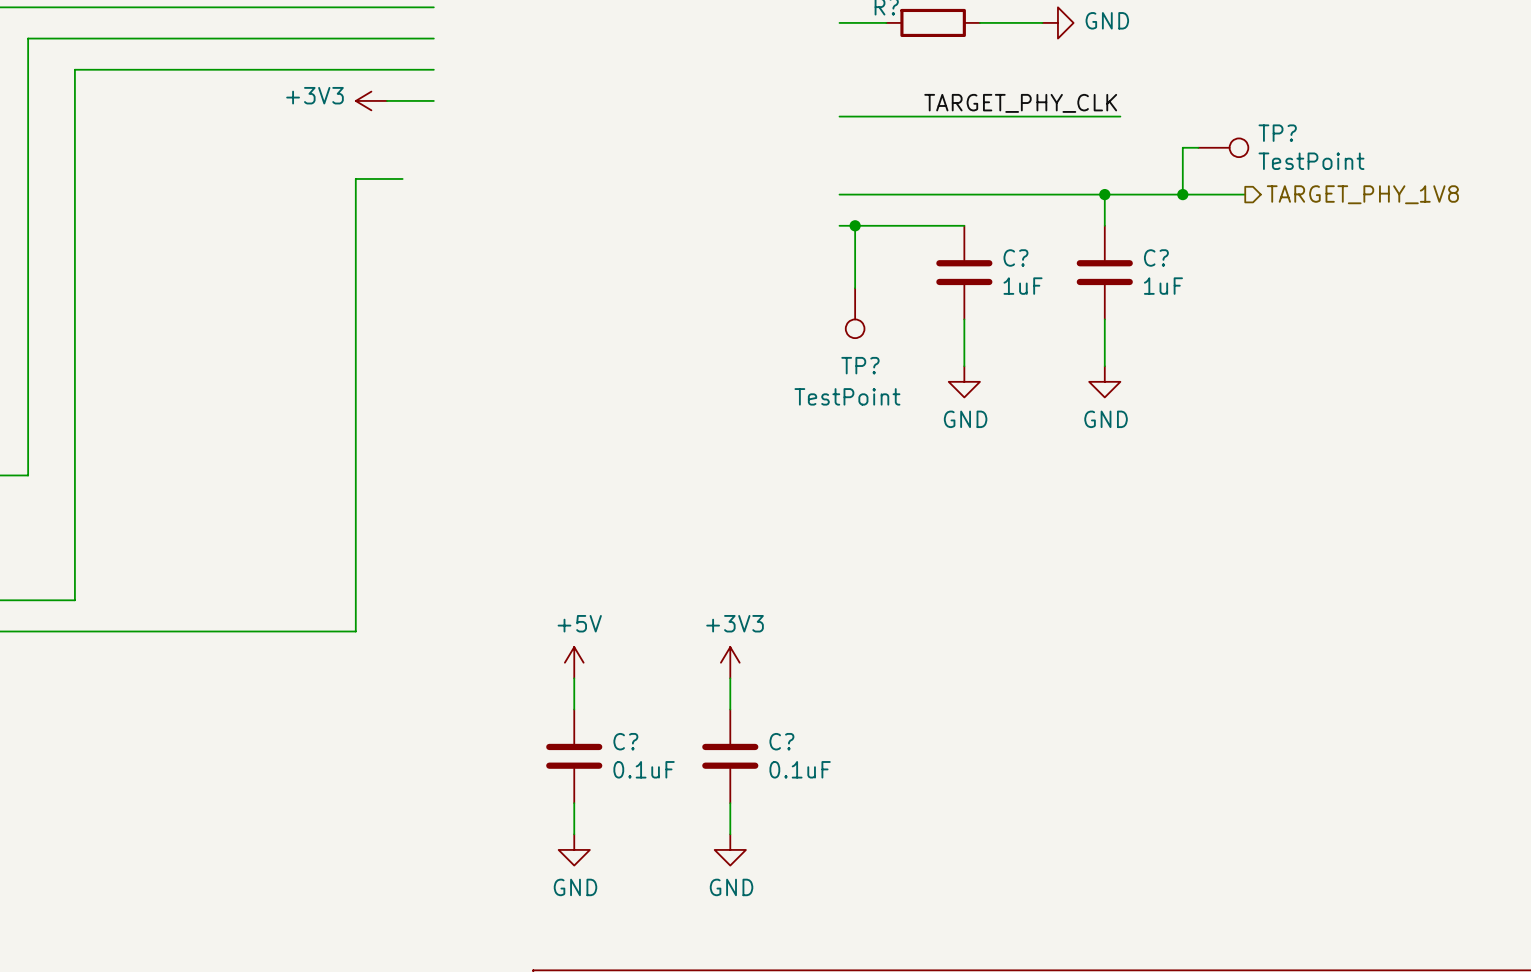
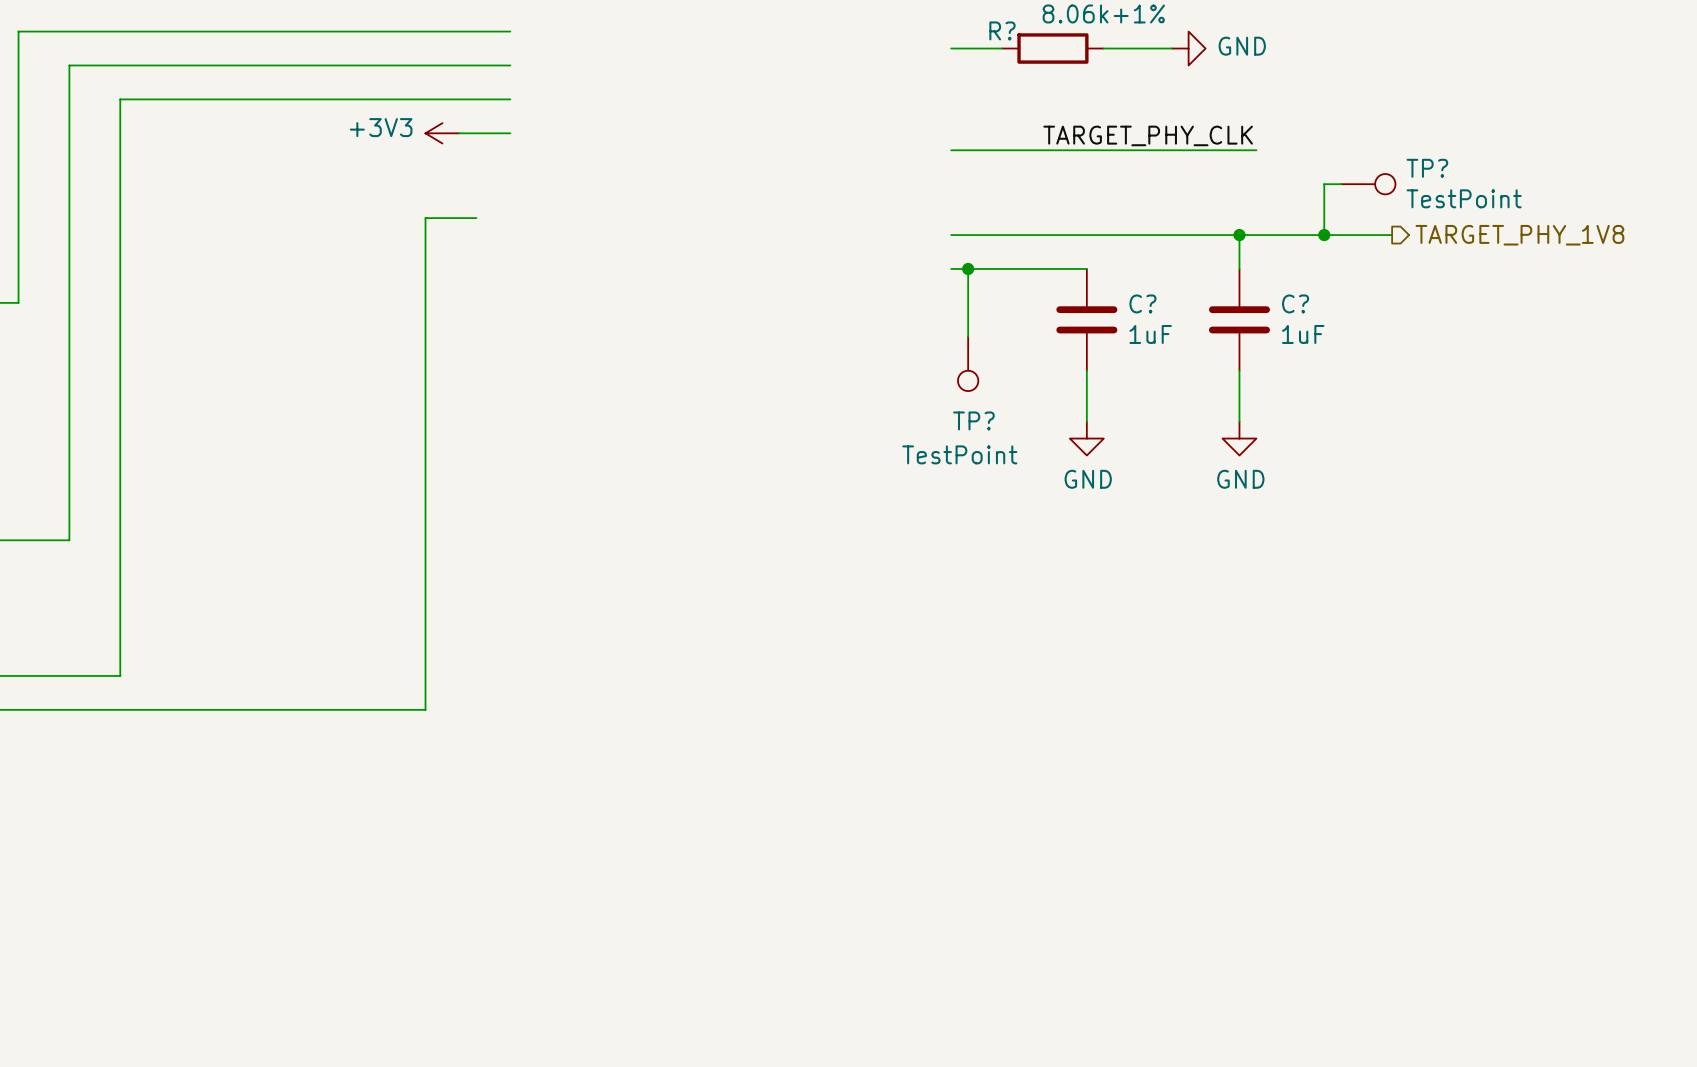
power symbol: +5V (574, 662) -> none
power symbol: +3V3 (730, 662) -> none
wire: (574, 678) (574, 709) -> none
wire: (730, 678) (730, 709) -> none
C?: 0.1uF (574, 756) -> none
C?: 0.1uF (730, 756) -> none
wire: (574, 803) (574, 834) -> none
wire: (730, 803) (730, 834) -> none
power symbol: GND (574, 849) -> none
power symbol: GND (730, 849) -> none

